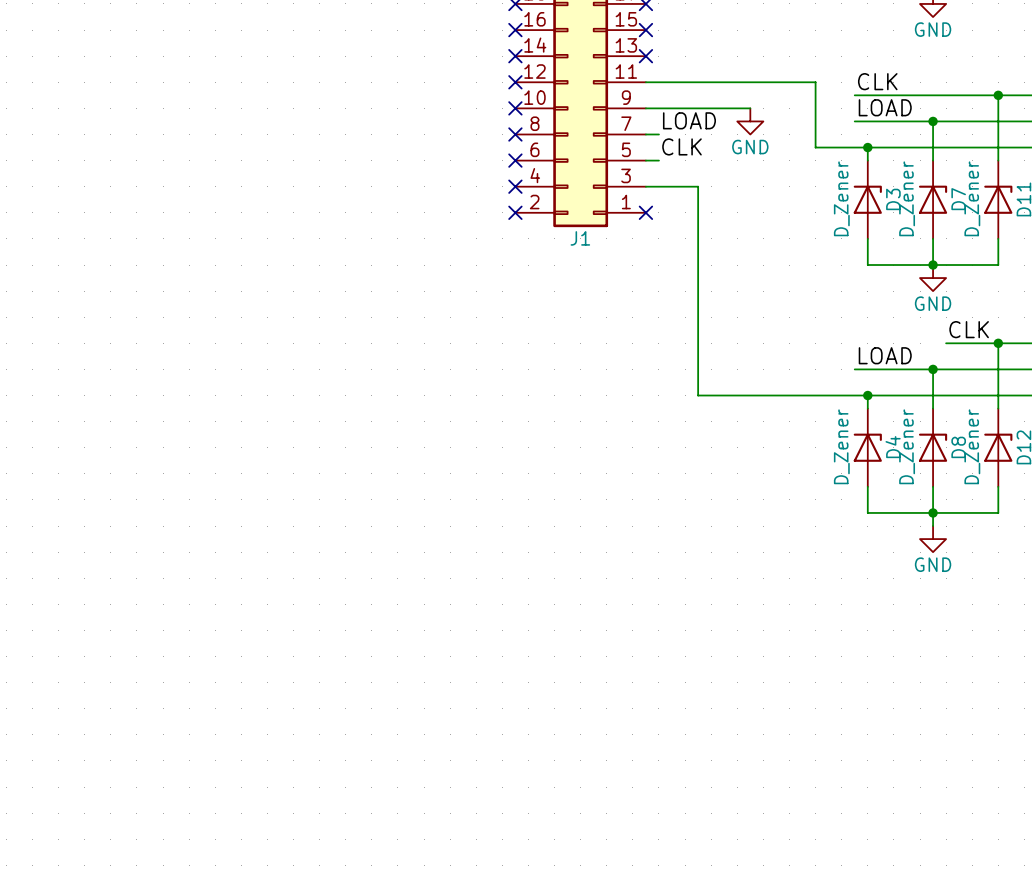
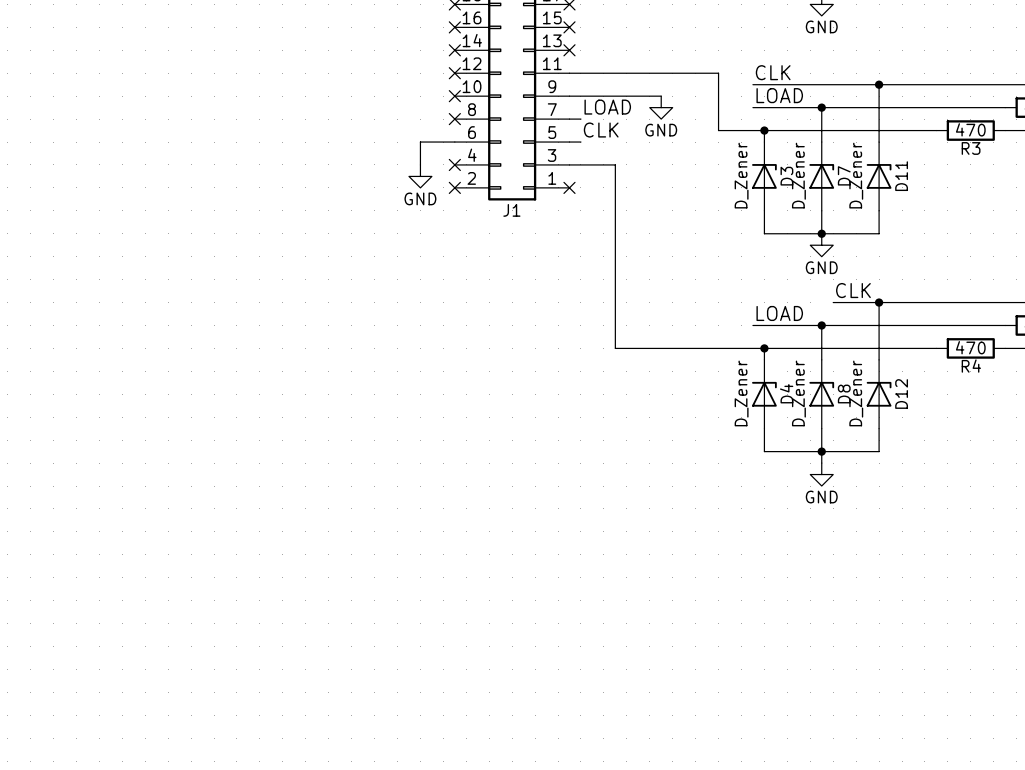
wire: none -> (454, 142) (420, 142) (420, 164)
no-connect mark: (515, 160) -> none
power symbol: none -> GND (420, 176)

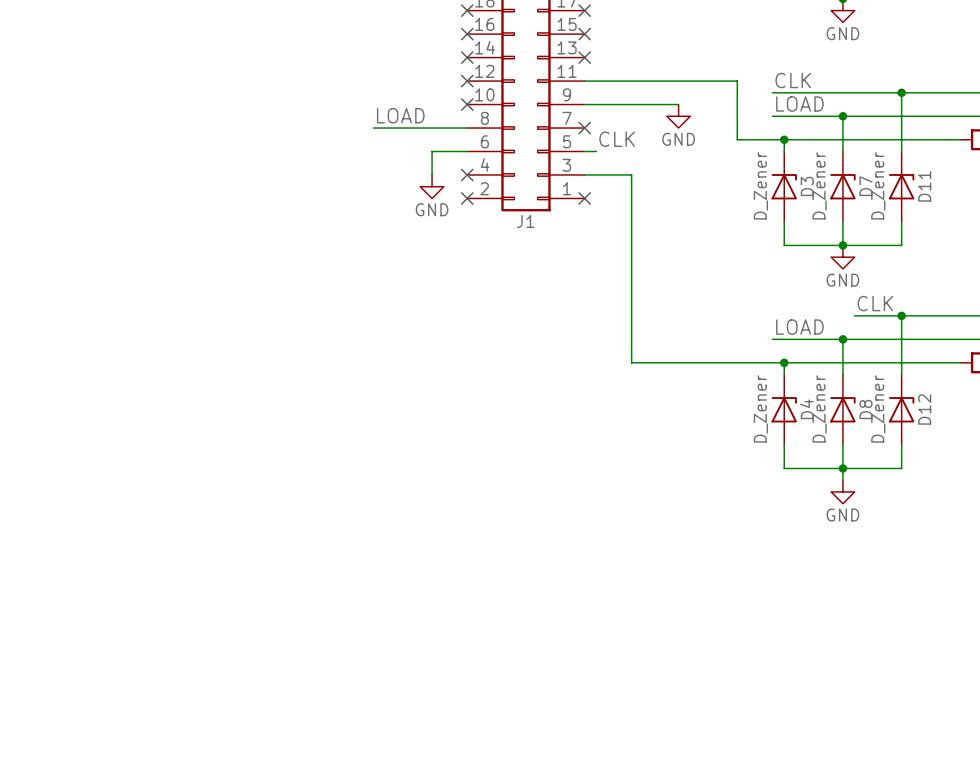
label position: LOAD (607, 107) -> LOAD (400, 115)
wire: none -> (373, 128) (467, 128)
no-connect mark: (454, 119) -> none
wire: (569, 119) (580, 119) -> none
no-connect mark: none -> (584, 128)

